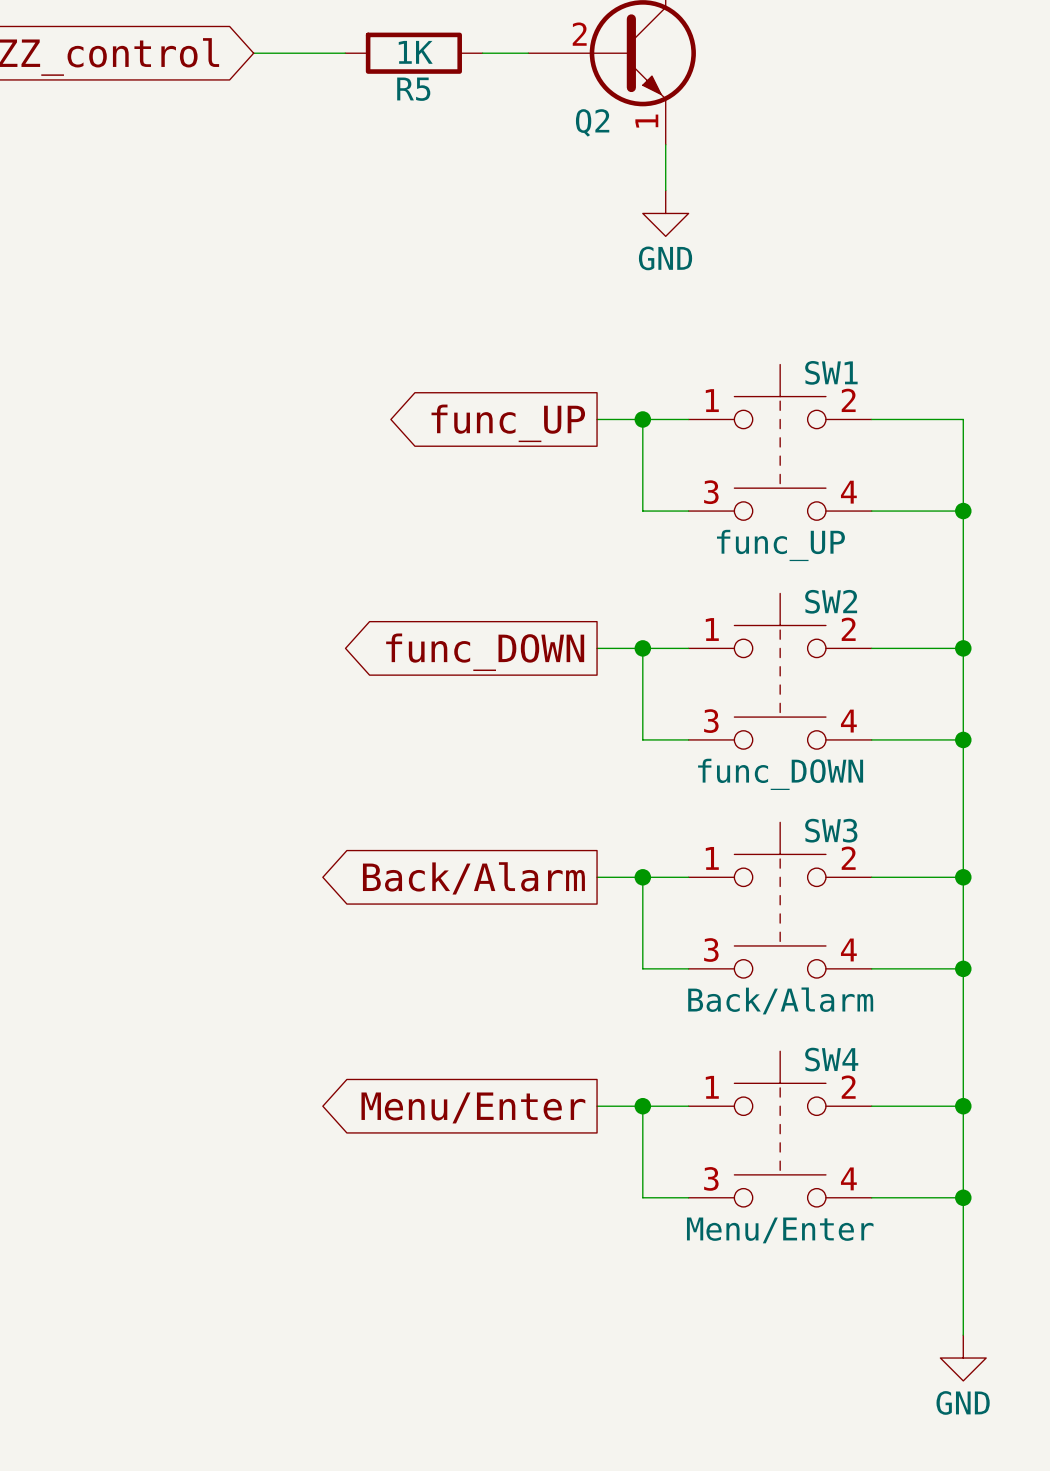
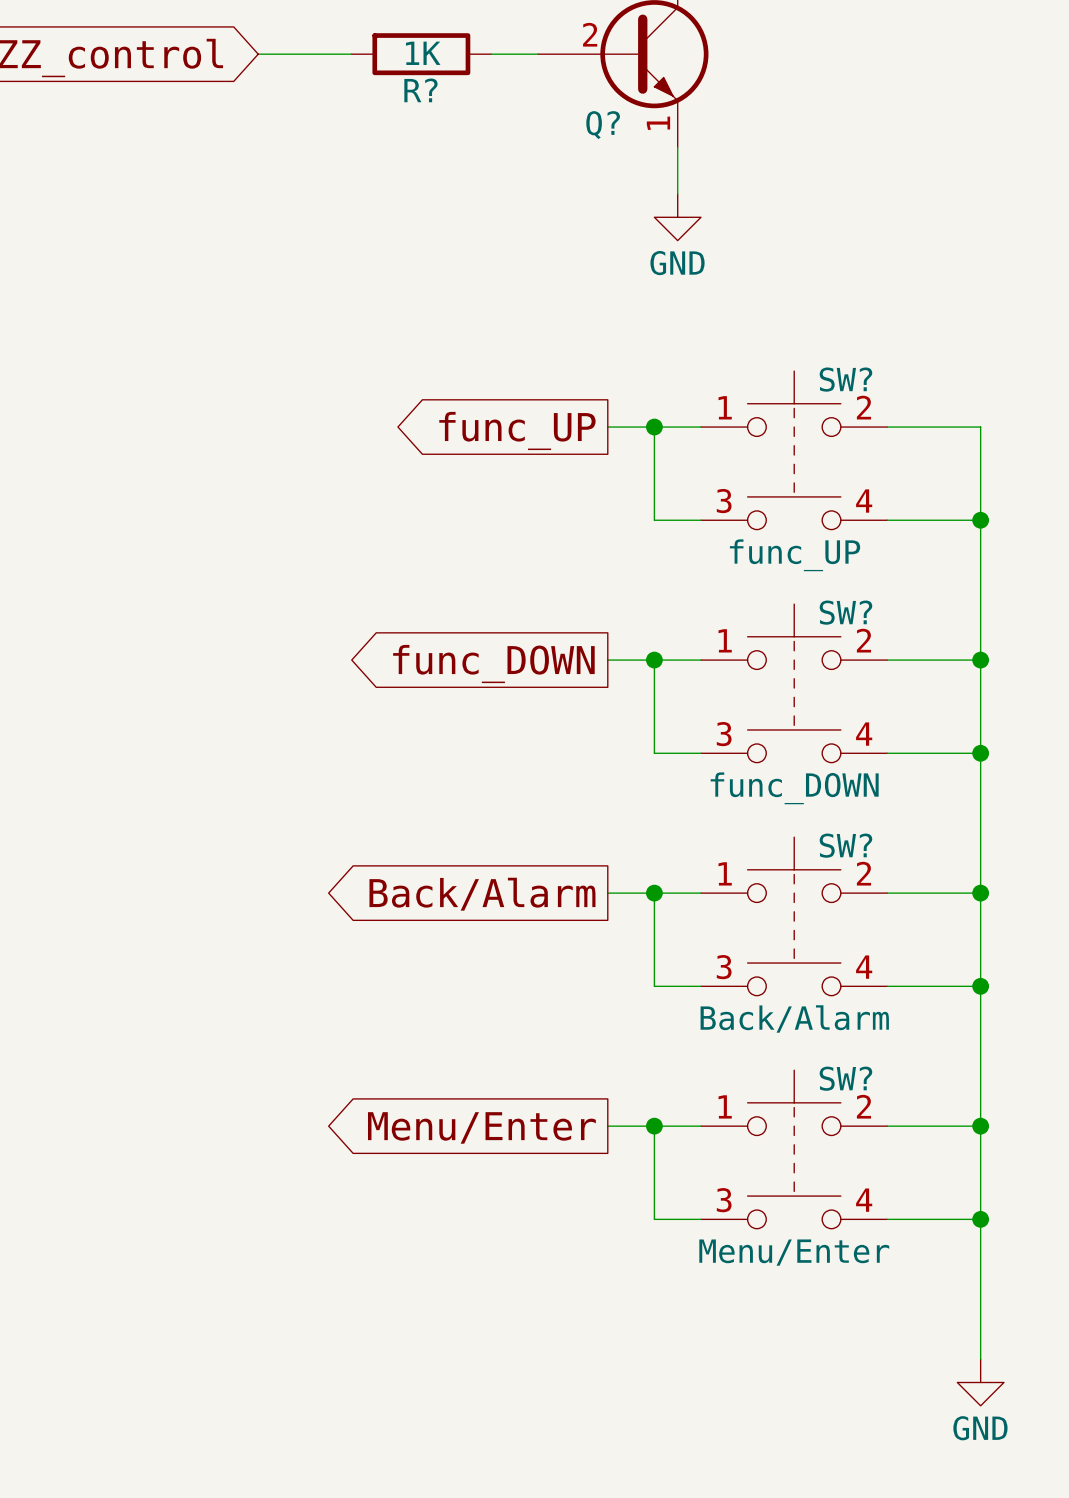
R5 name: R5 (413, 89) -> R? (420, 90)
Q2 name: Q2 (592, 122) -> Q? (603, 125)
SW1 name: SW1 (831, 372) -> SW? (845, 379)
SW2 name: SW2 (831, 601) -> SW? (845, 612)
SW3 name: SW3 (831, 830) -> SW? (845, 845)
SW4 name: SW4 (831, 1059) -> SW? (845, 1078)

